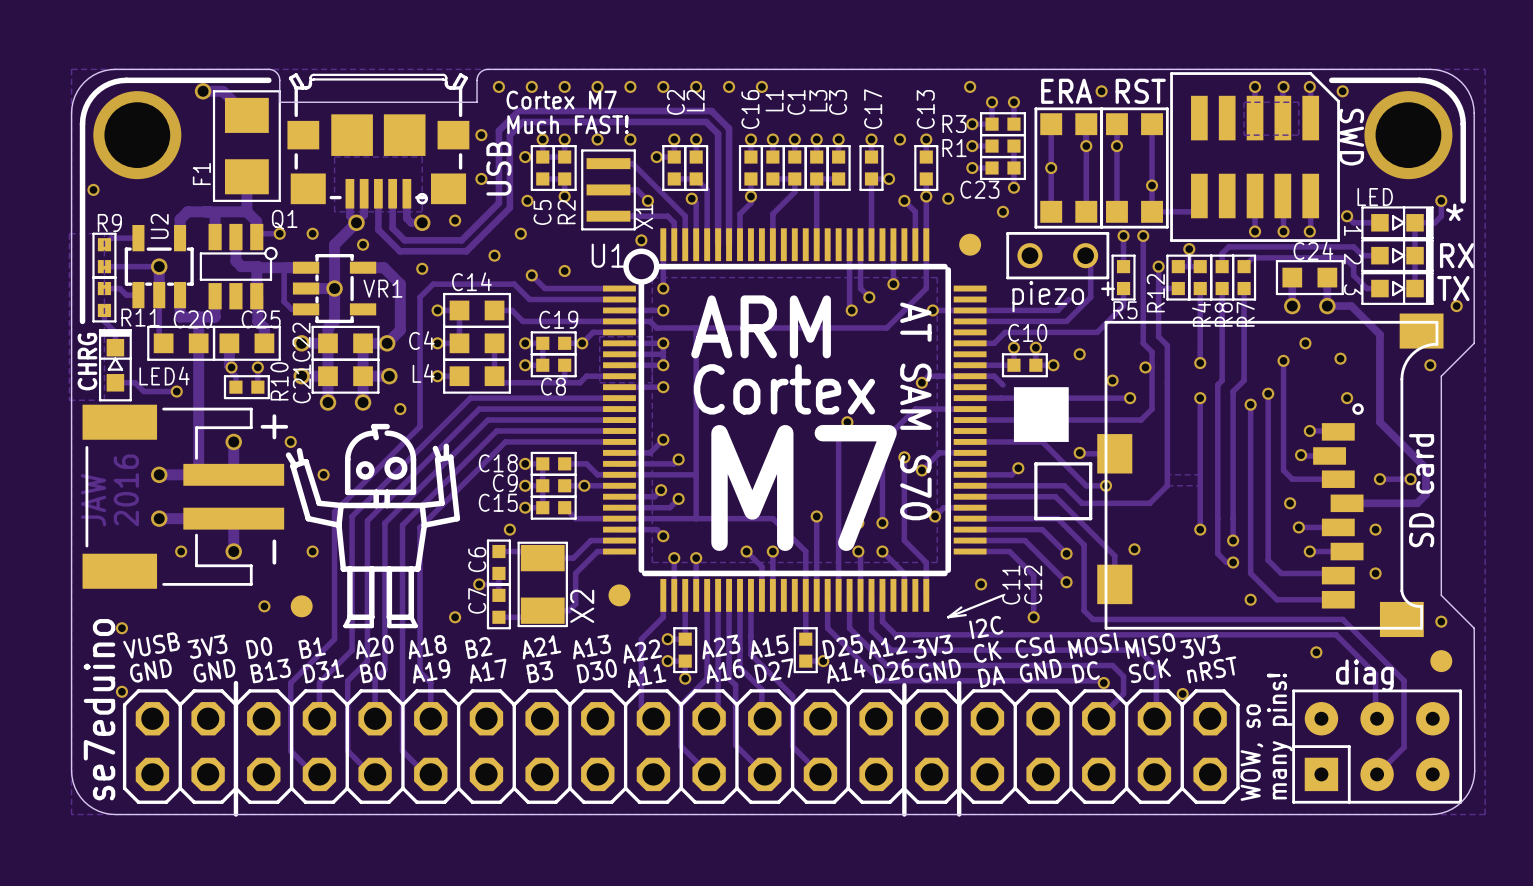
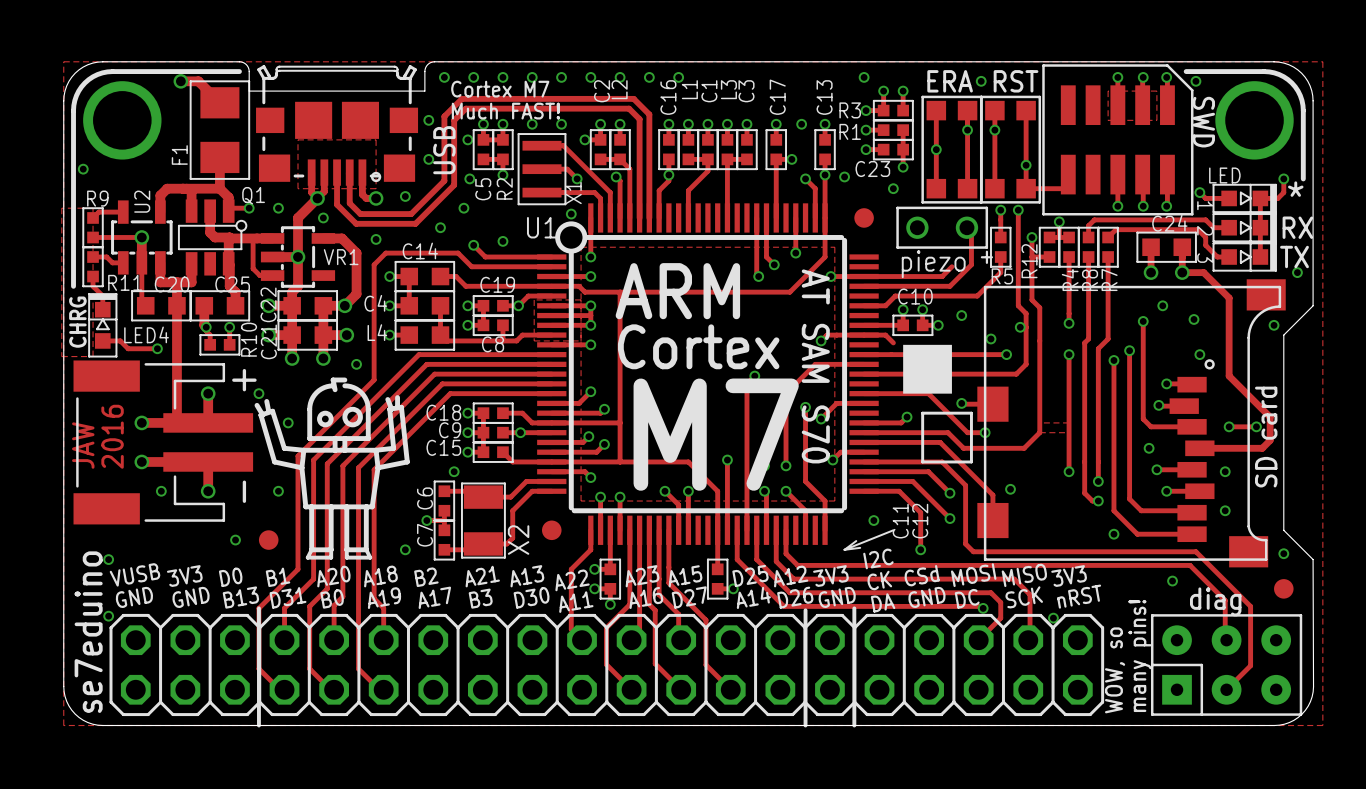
line: (235, 683) (235, 814) -> (258, 608) (258, 725)

